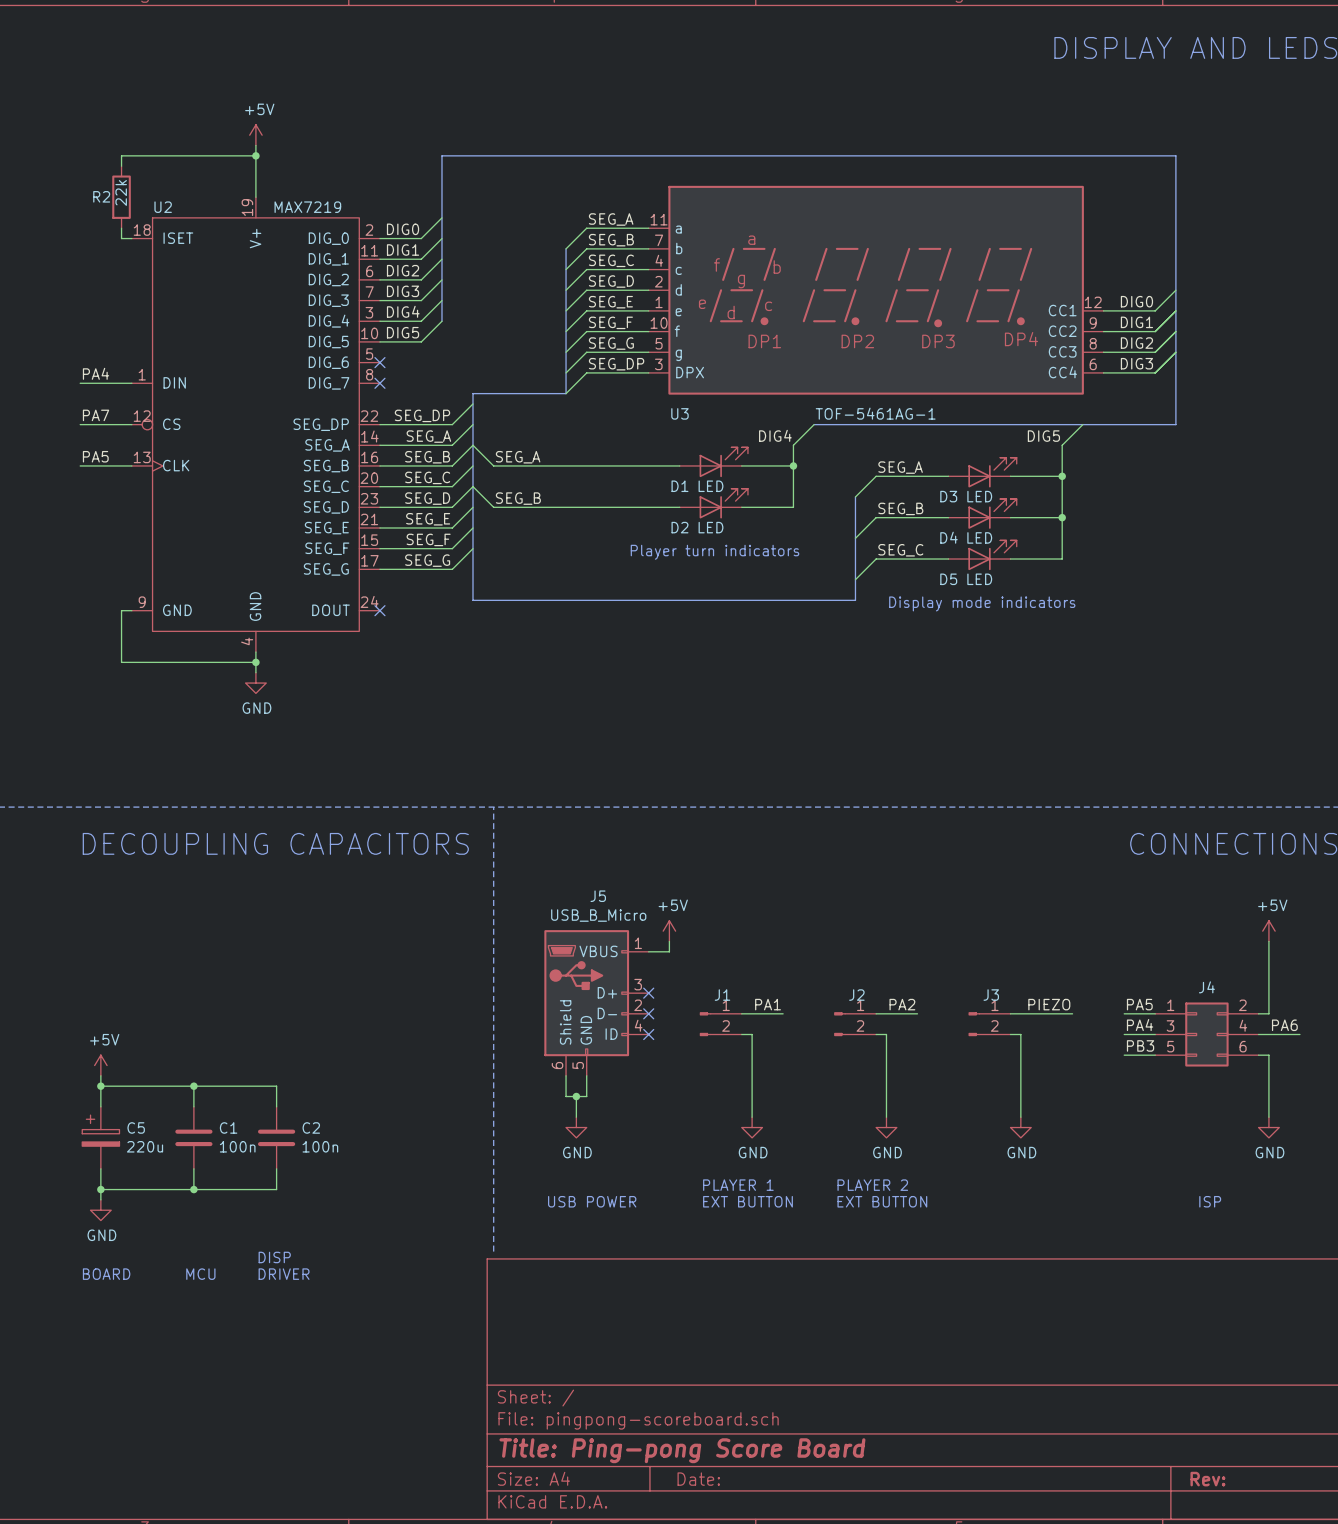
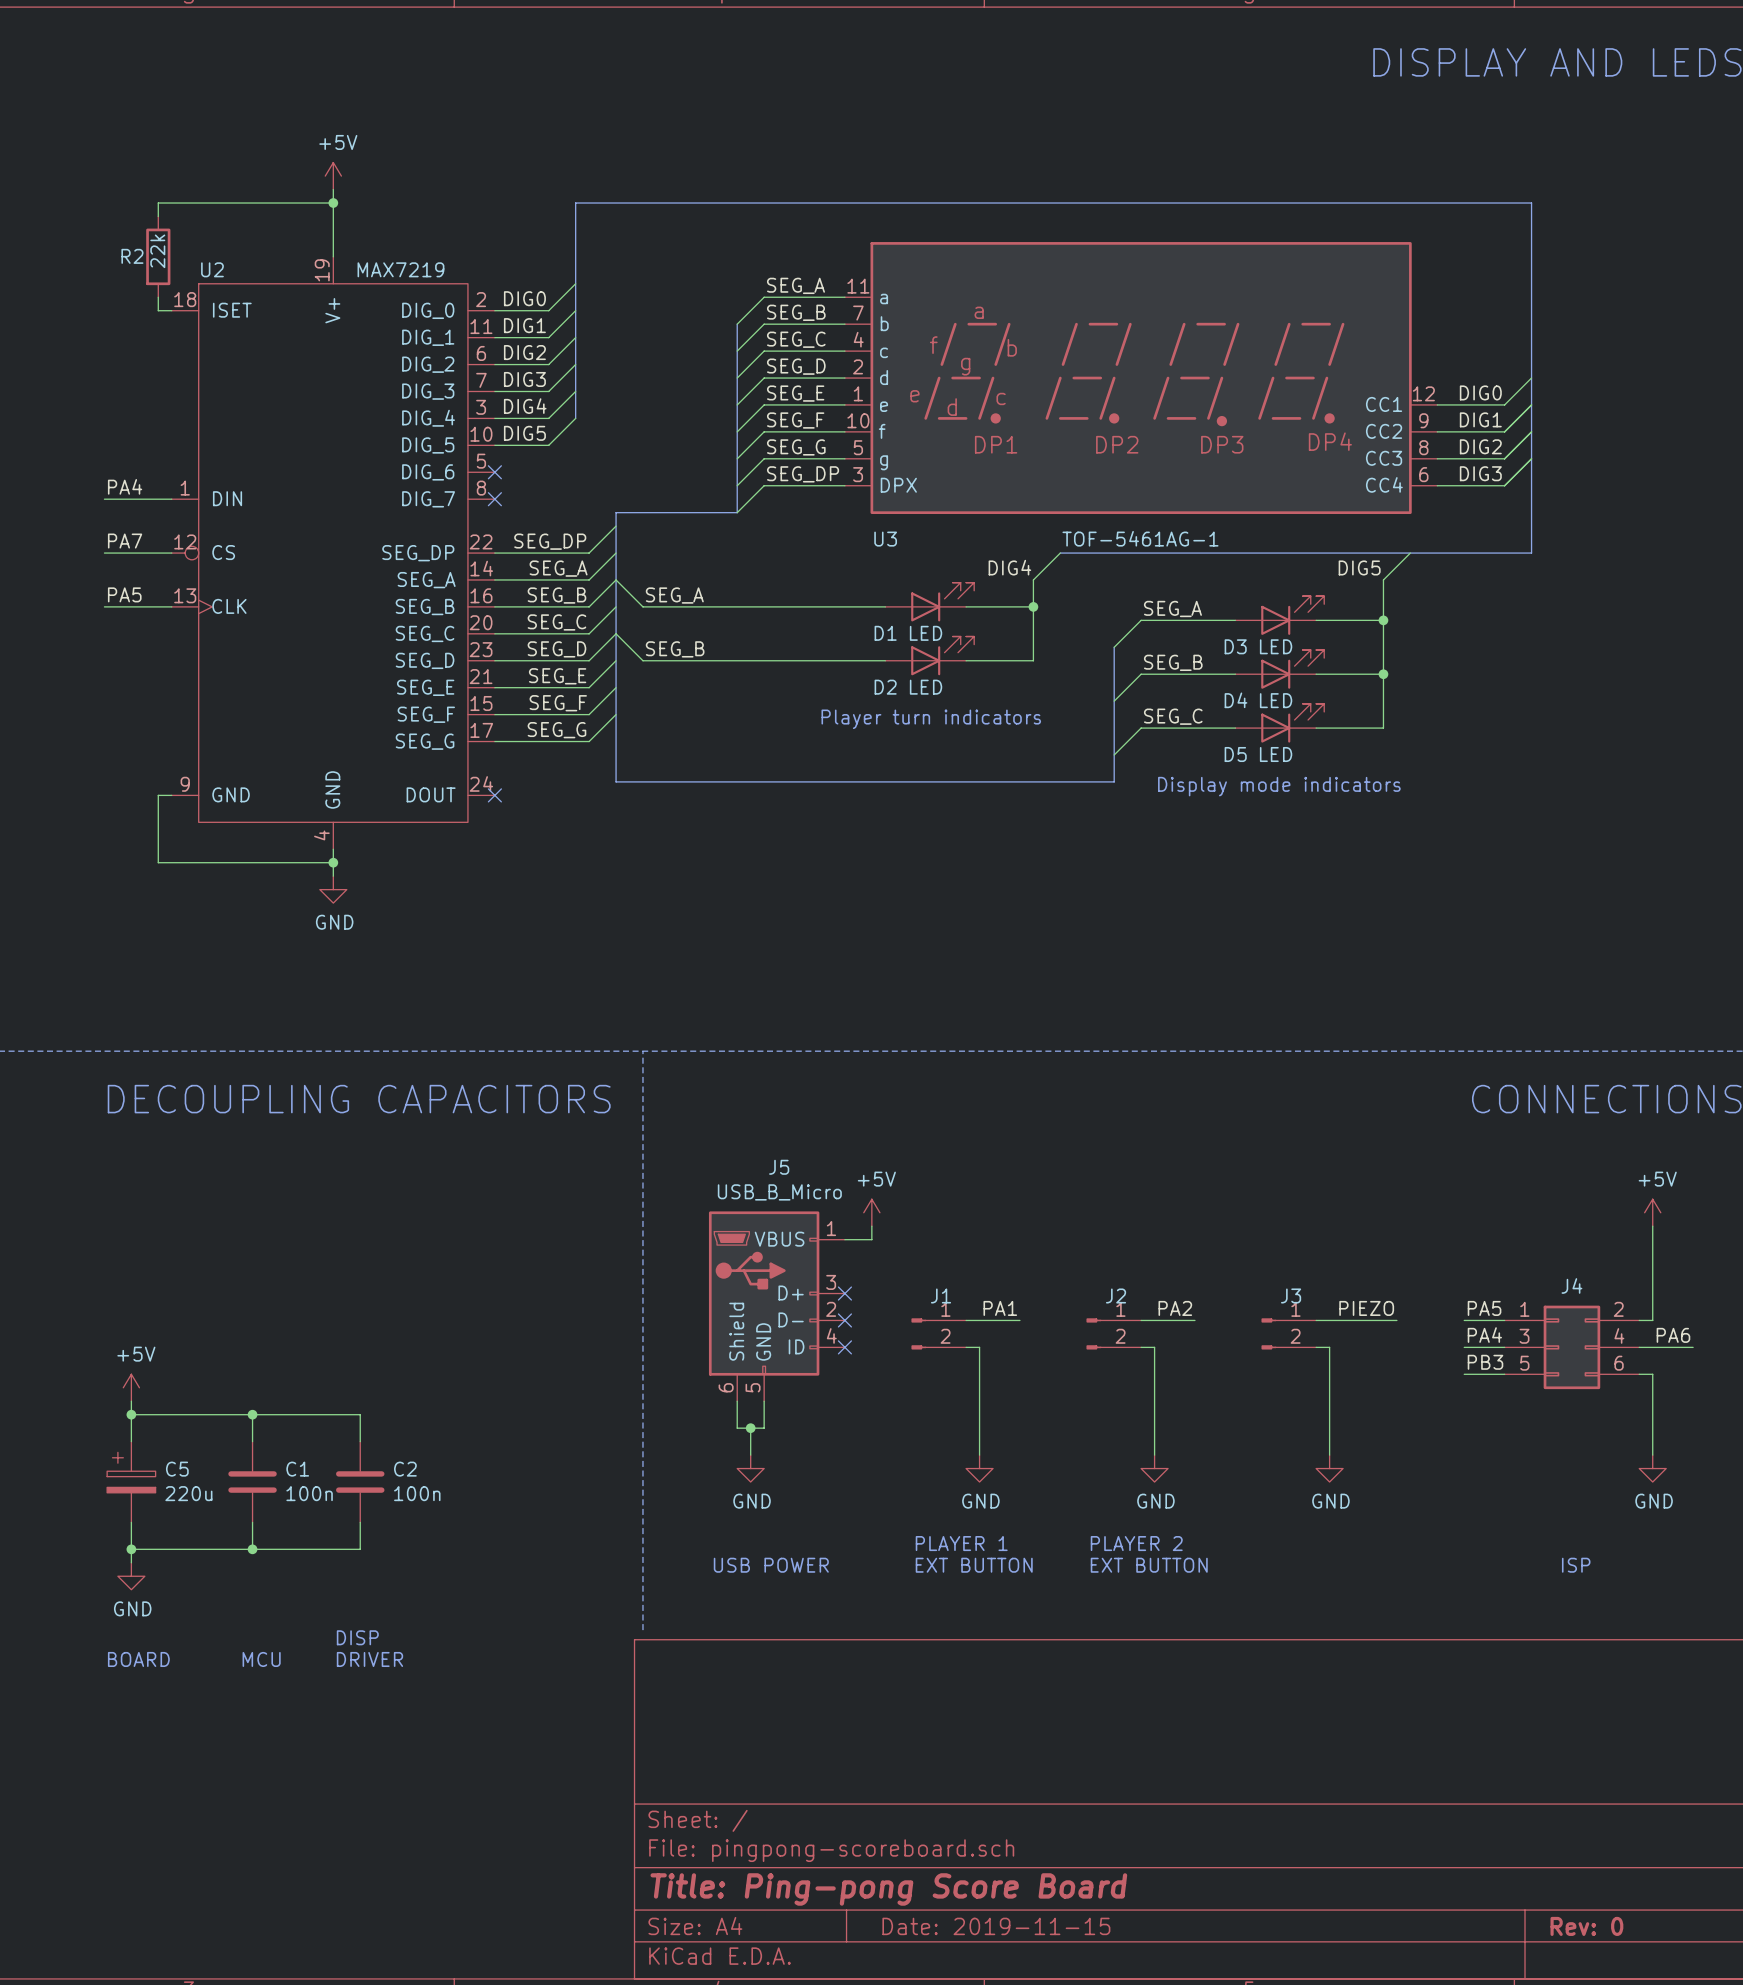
title block: Date: (698, 1479) -> Date: 2019-11-15 (996, 1926)
title block: Rev: (1207, 1479) -> Rev: 0 (1586, 1926)

